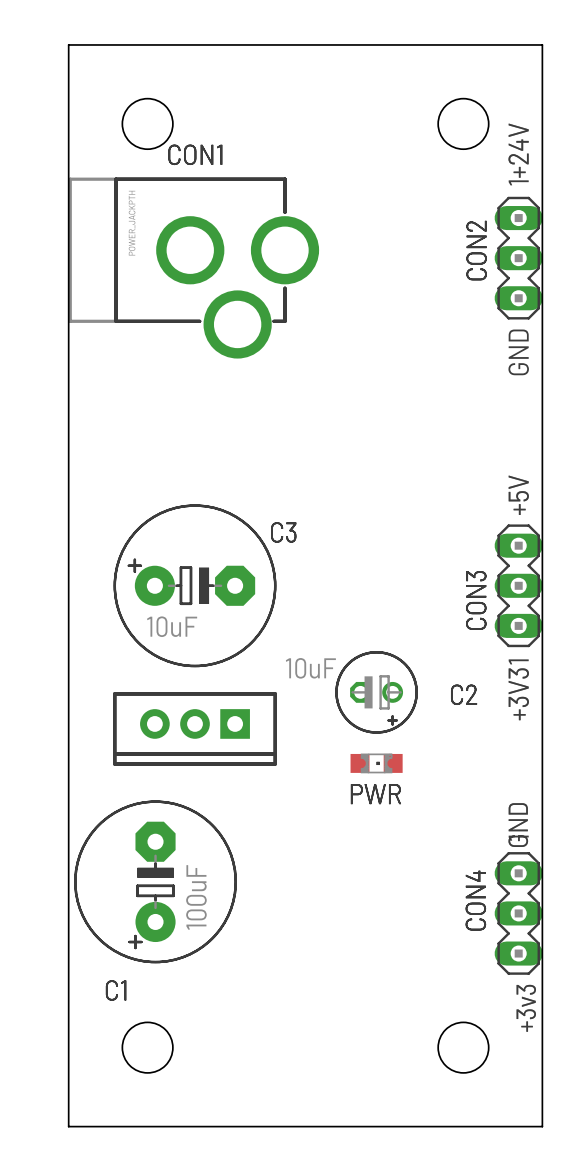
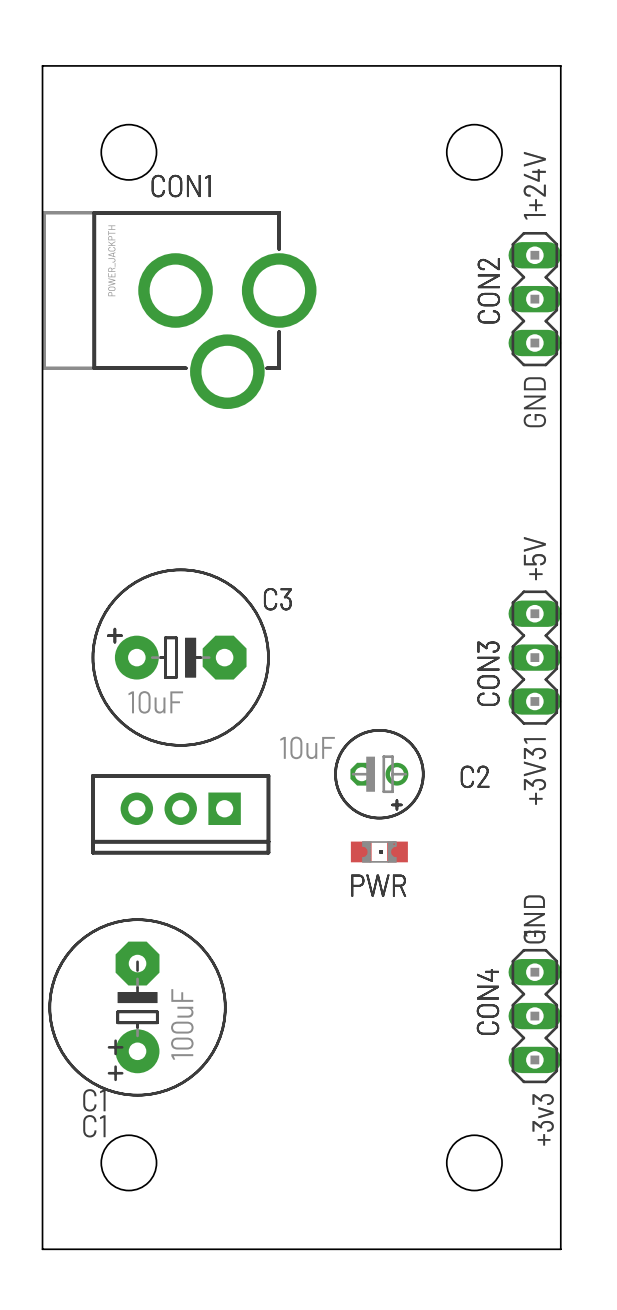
drawing position: (155, 872) -> (137, 997)
drawing position: (155, 881) -> (137, 1007)
C1 position: (155, 881) -> (137, 1007)
line: (137, 885) (173, 885) (173, 895) (137, 895) (137, 885) -> (117, 1011) (157, 1011) (157, 1022) (117, 1022) (117, 1011)
line: none -> (137, 1022) (137, 1027)

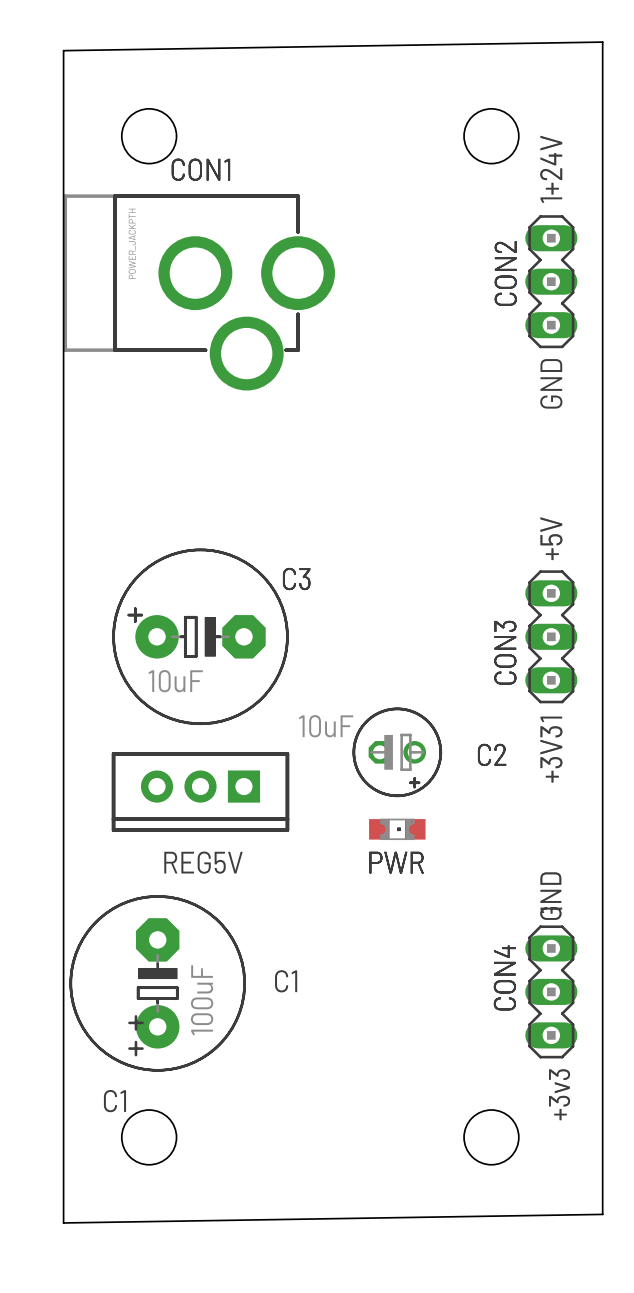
board edge: (42, 65) (560, 65) (560, 1249) (42, 1249) -> (63, 50) (602, 42) (602, 1214) (63, 1222)
text: none -> REG5V (203, 862)
line: (137, 961) (137, 970) -> none
text position: C1 (94, 1100) -> C1 (286, 981)

